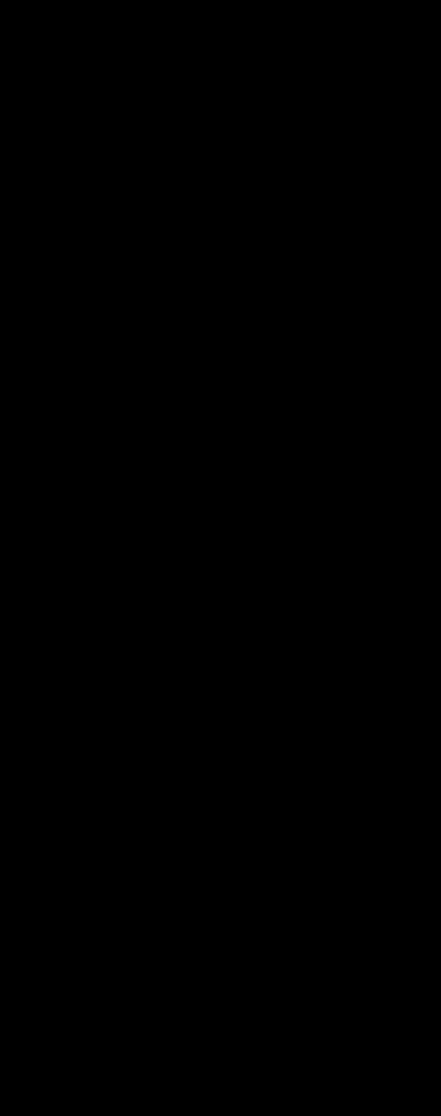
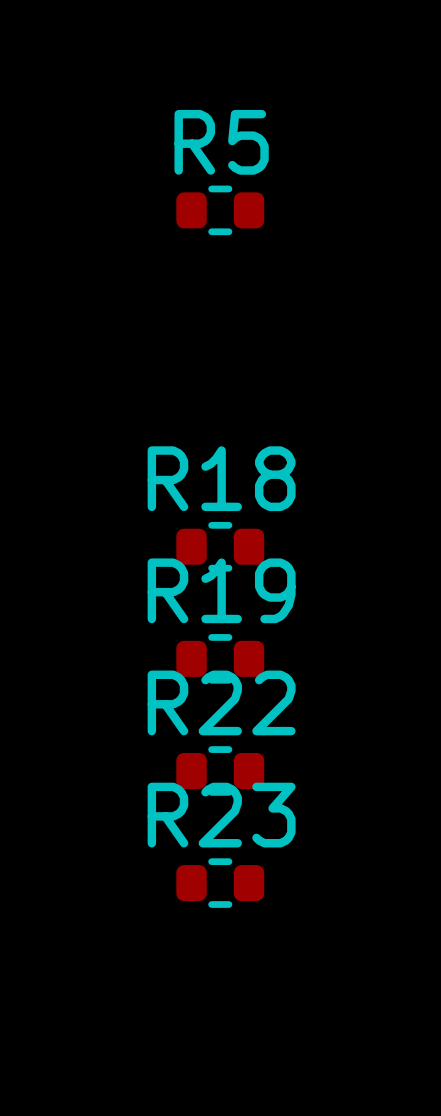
R5: none -> (220, 210)
R18: none -> (220, 546)
R19: none -> (220, 658)
R22: none -> (220, 770)
R23: none -> (220, 883)

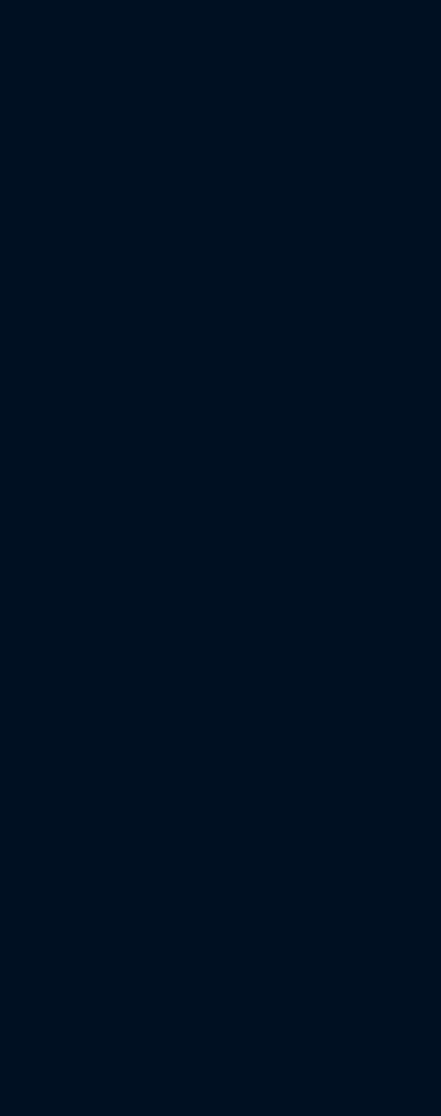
R5: (220, 210) -> none
R18: (220, 546) -> none
R19: (220, 658) -> none
R22: (220, 770) -> none
R23: (220, 883) -> none

